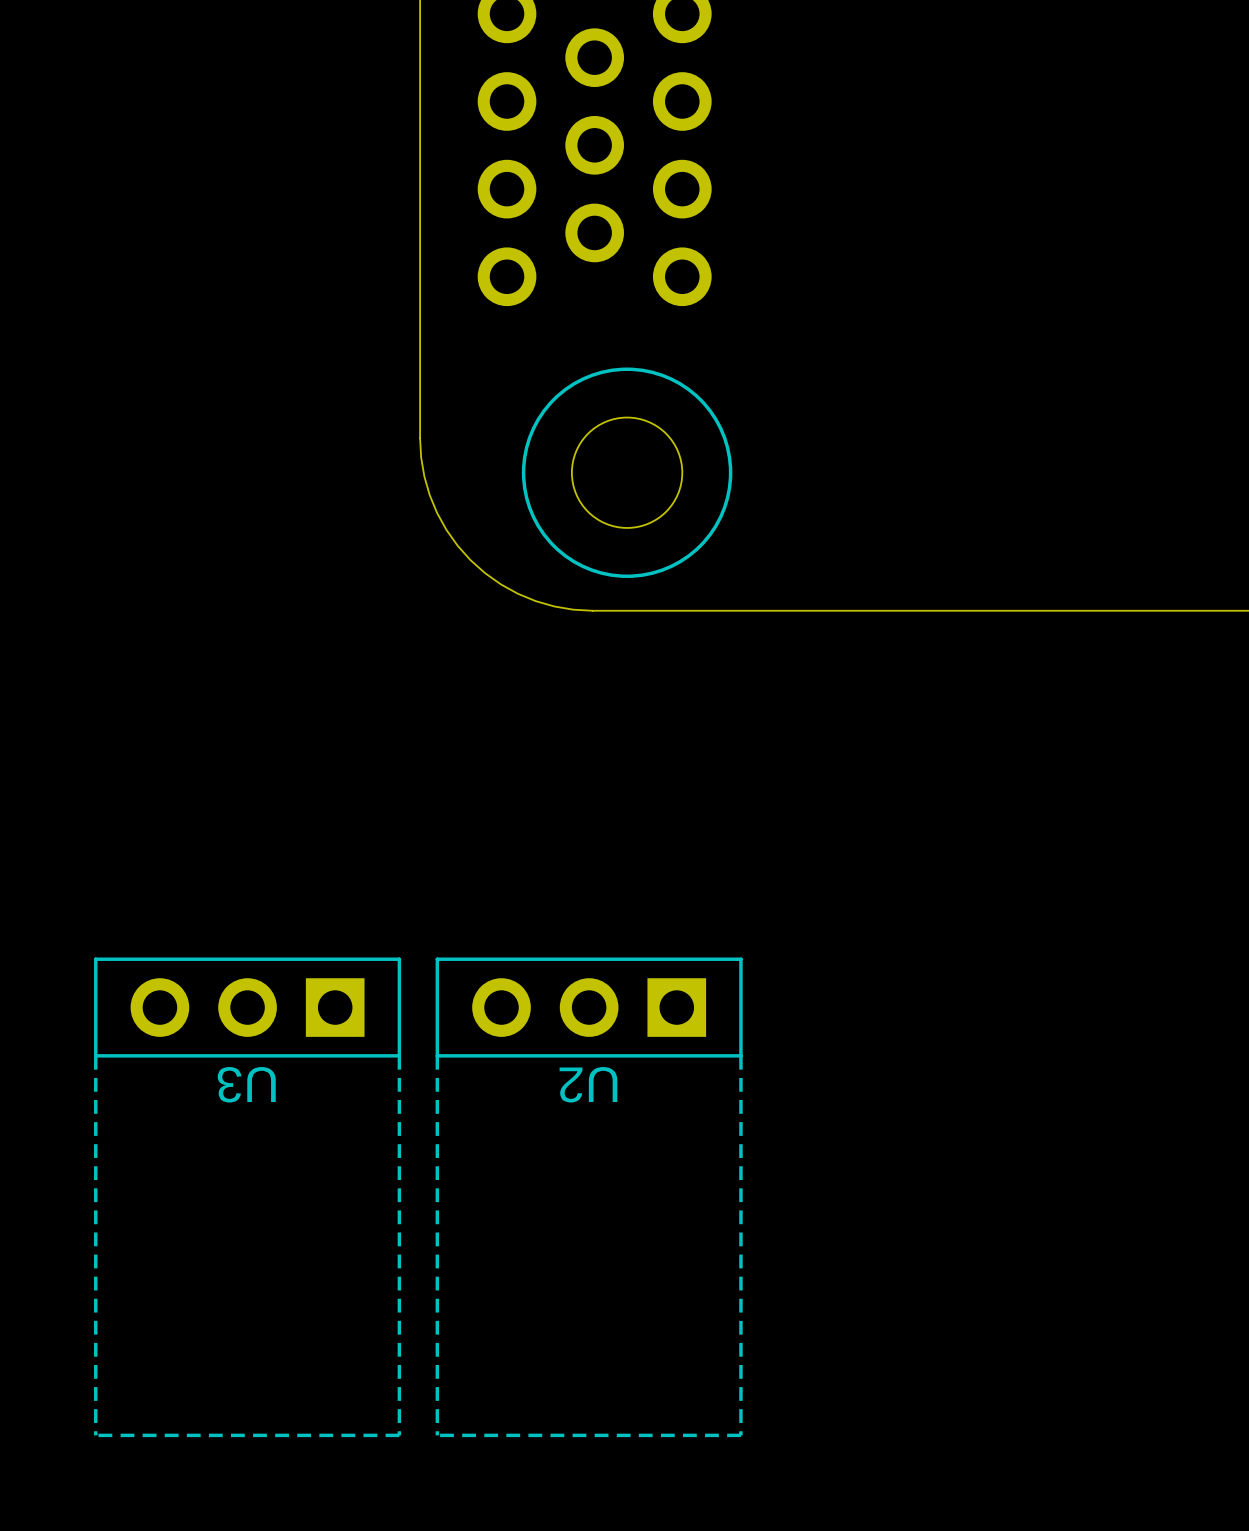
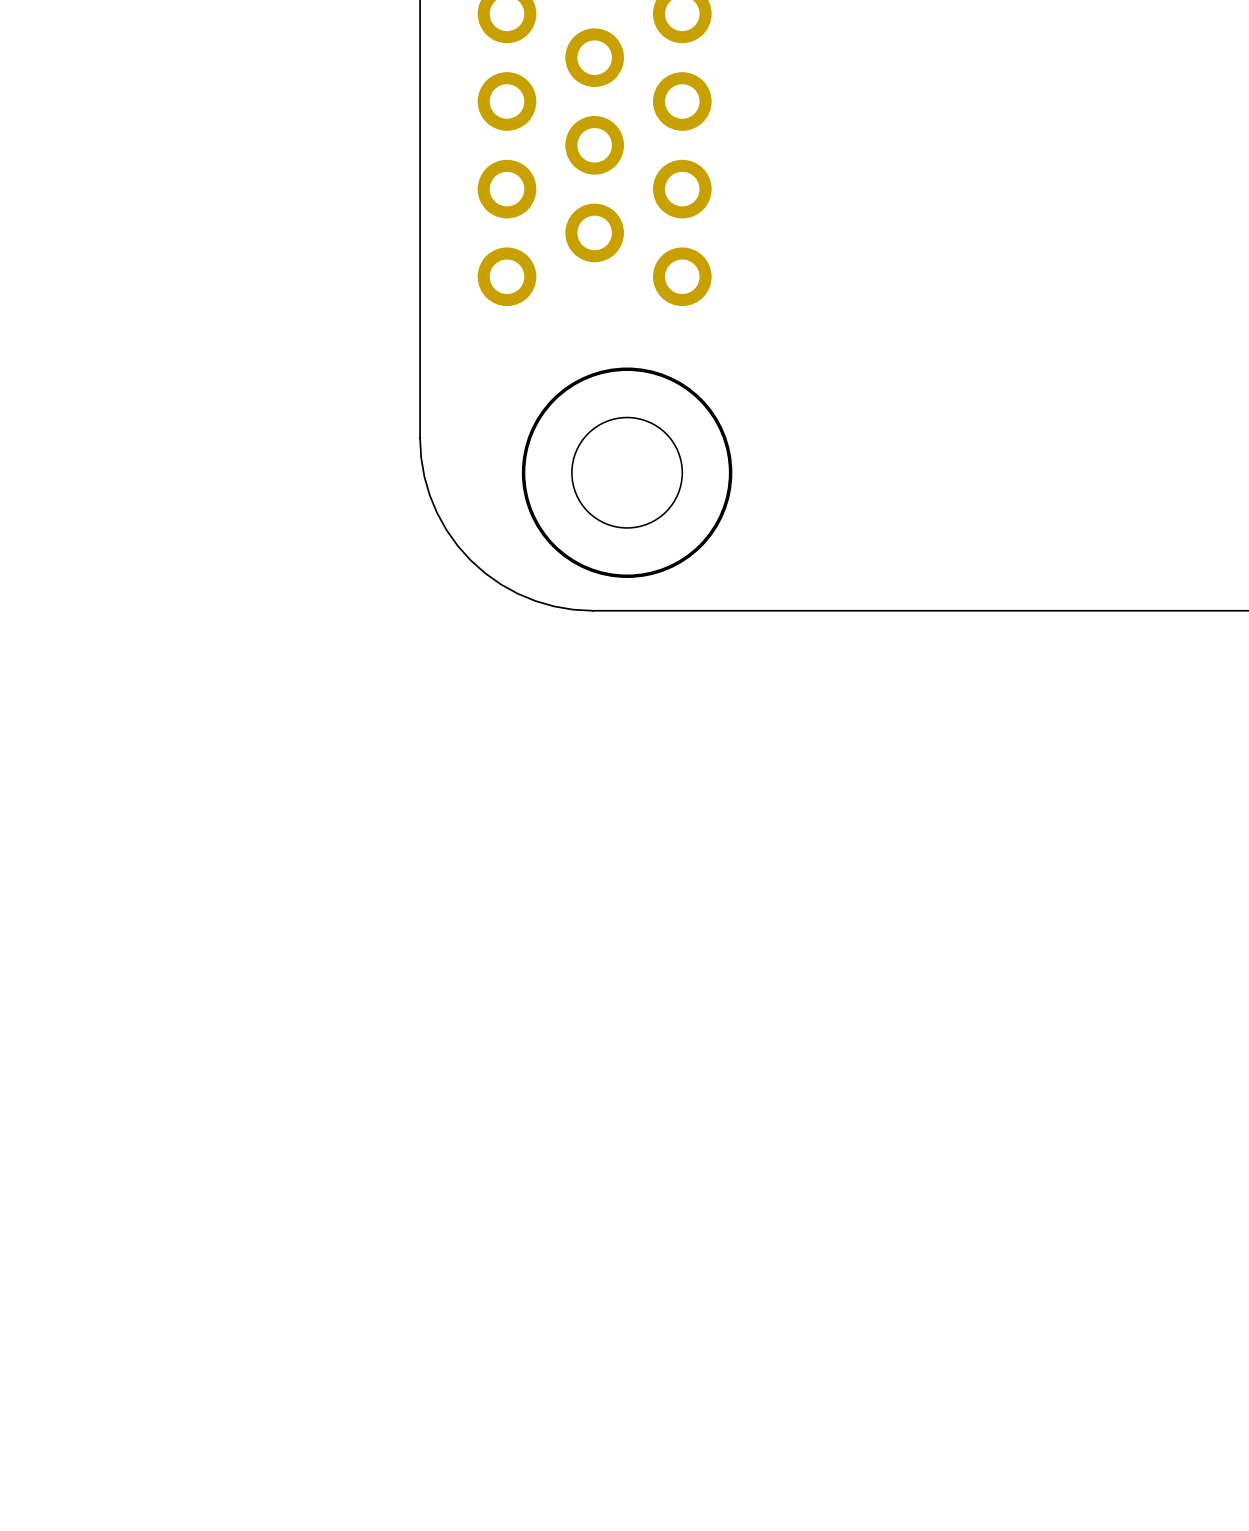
U3: (247, 1197) -> none
U2: (589, 1197) -> none

